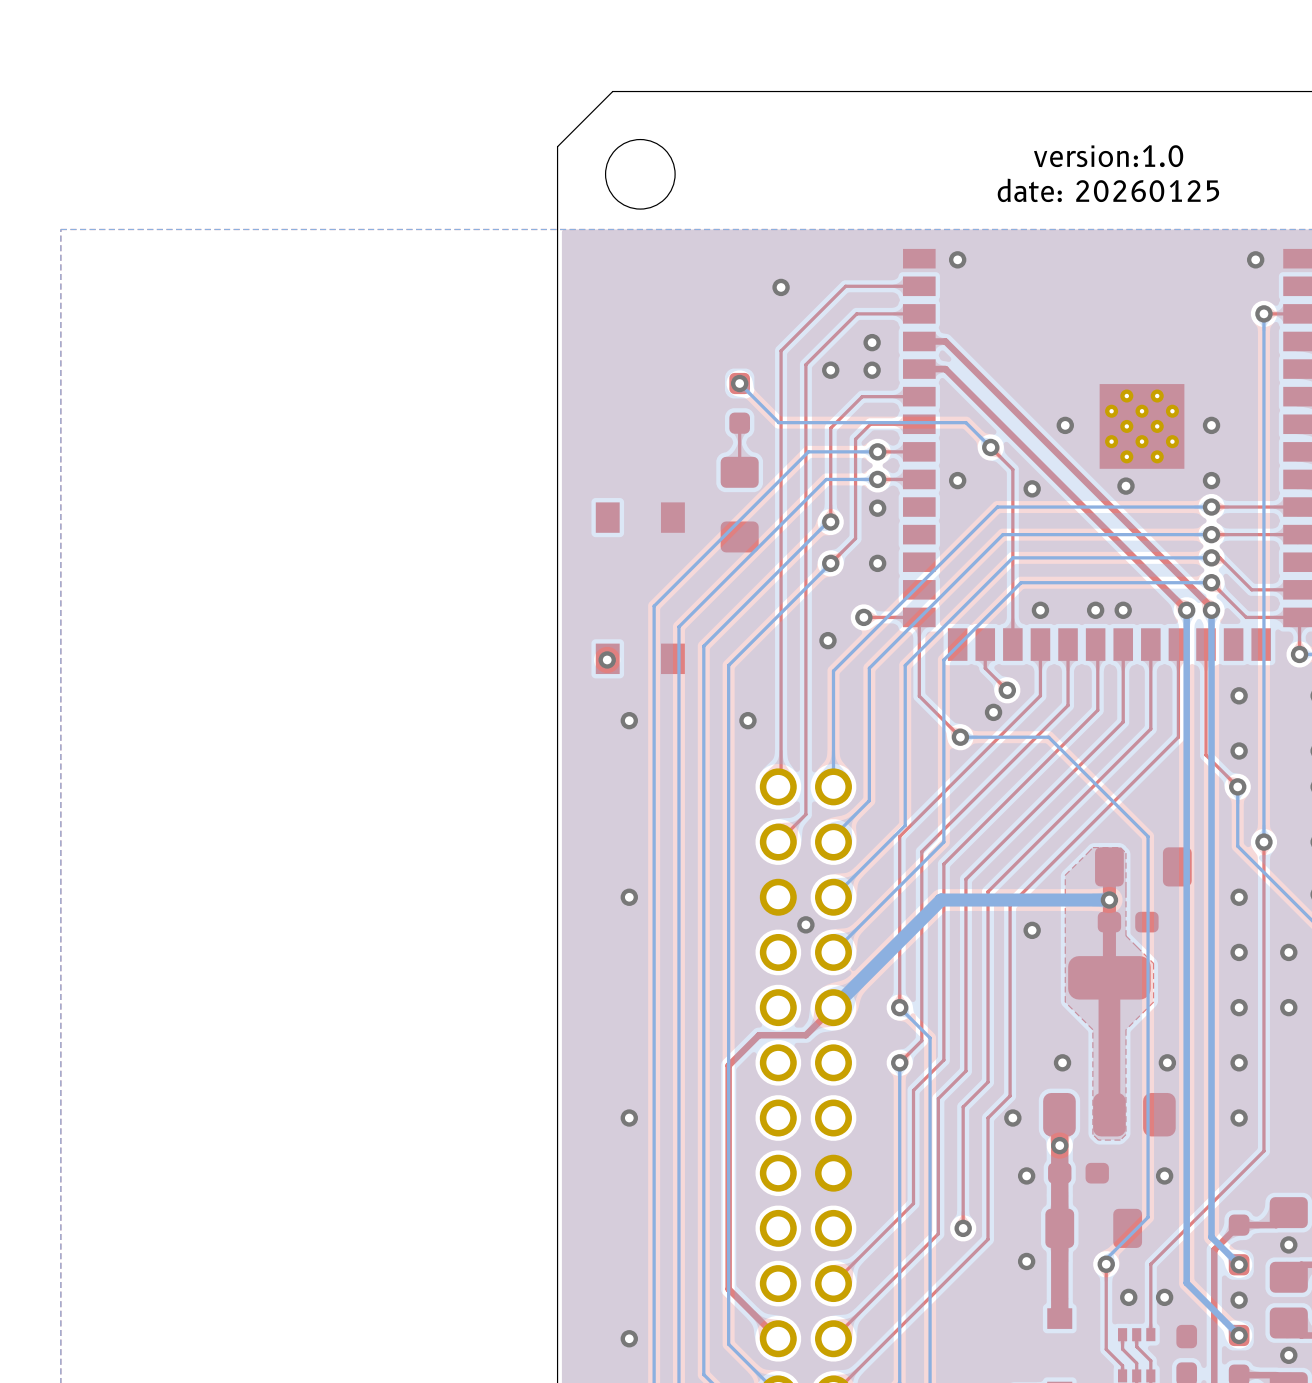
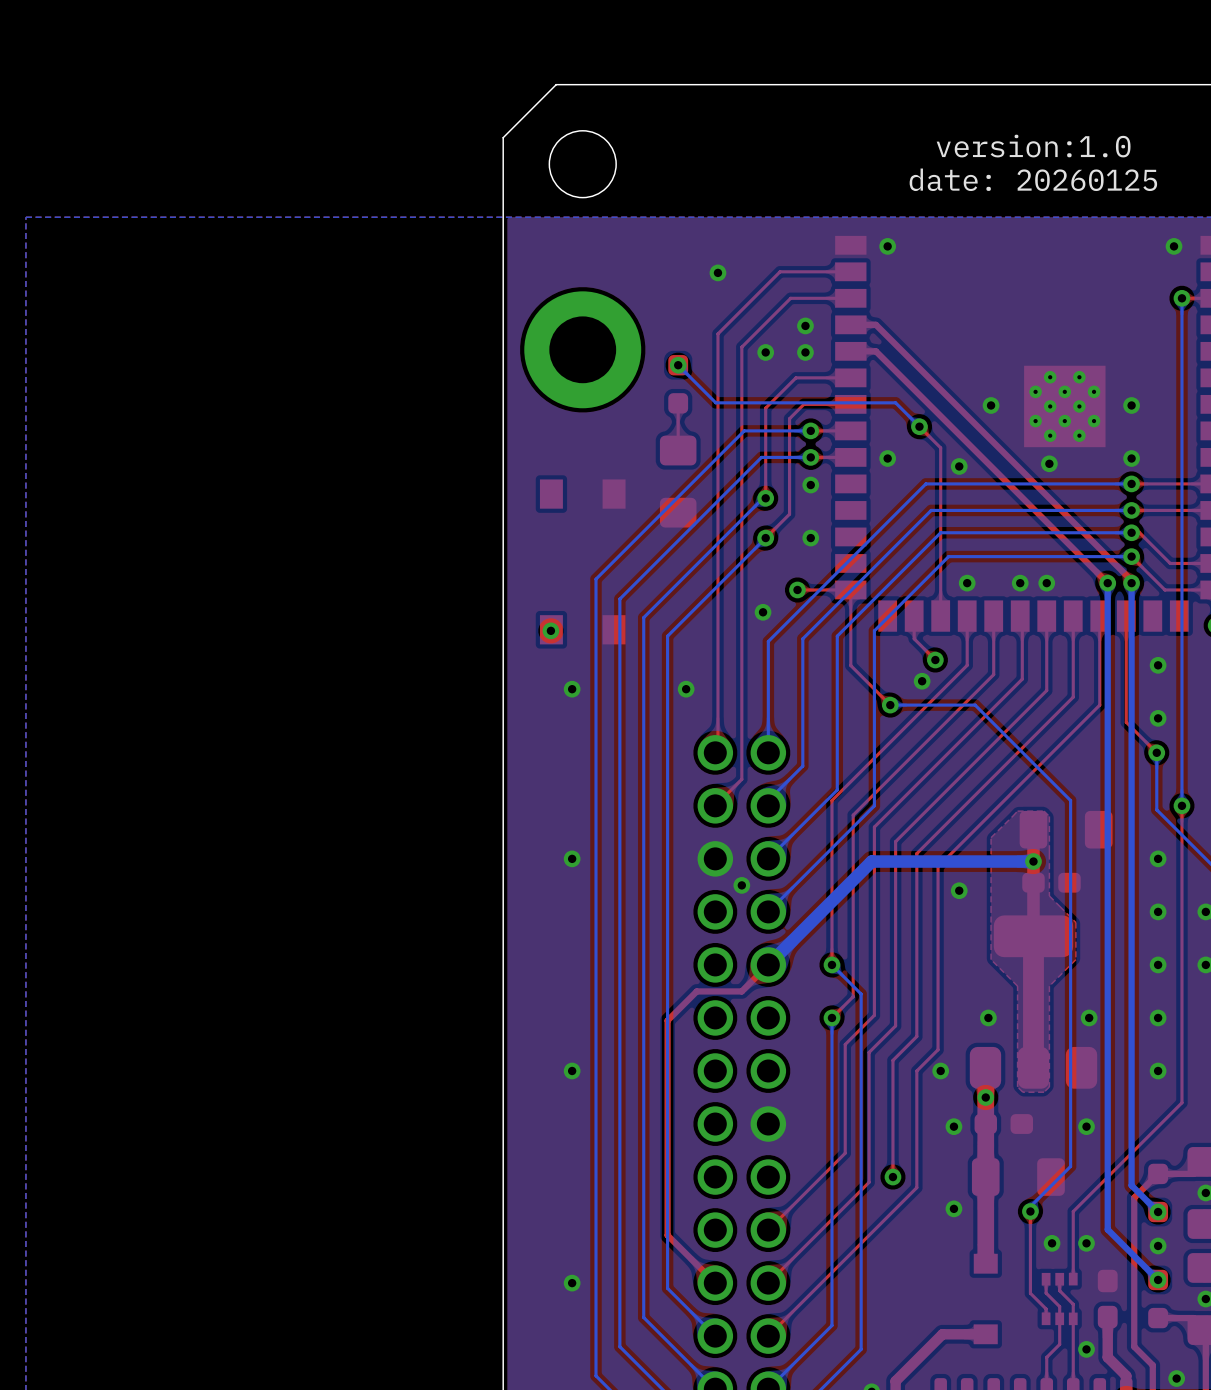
part: none -> (582, 349)

